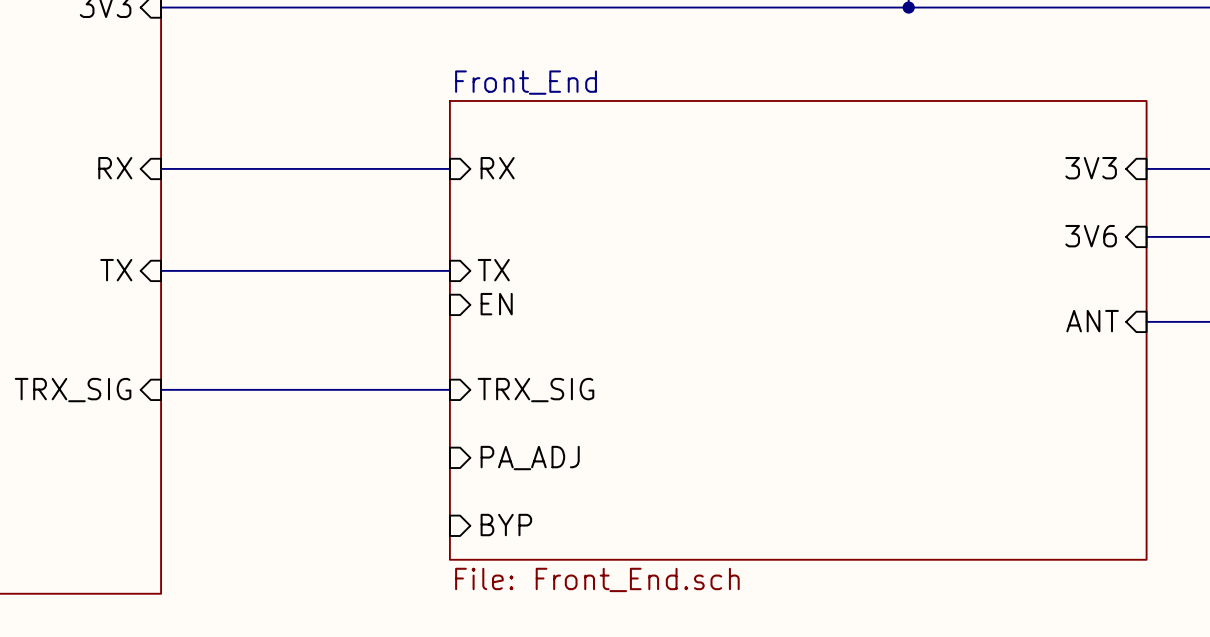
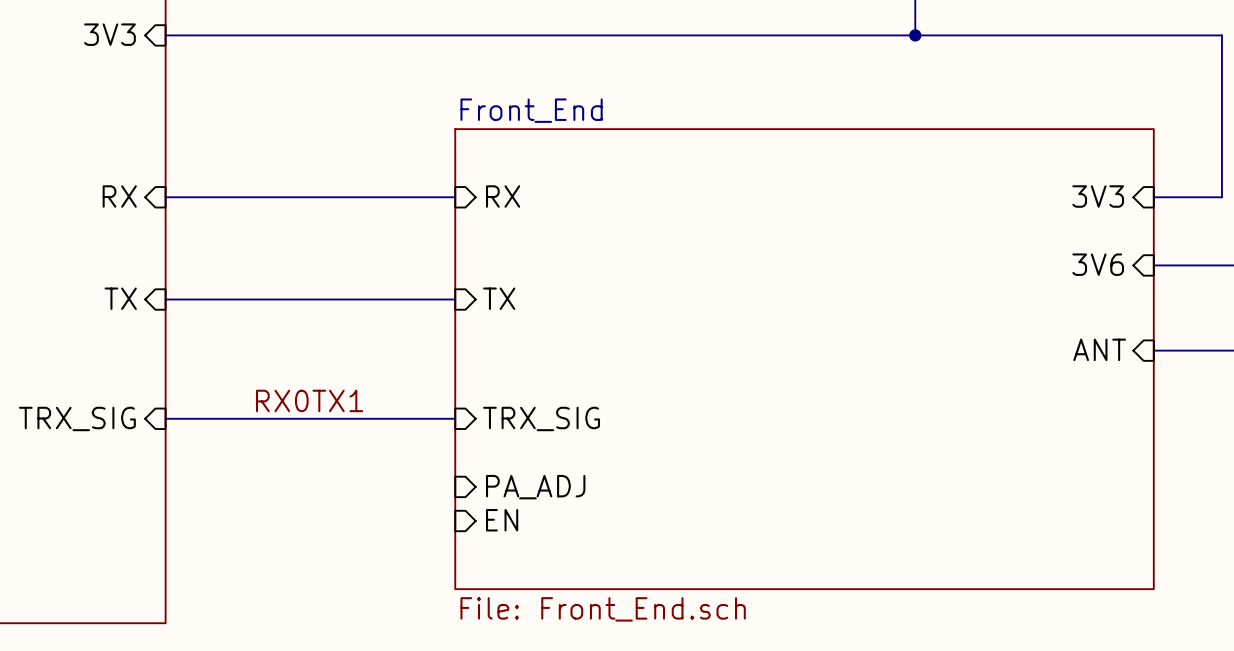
sheet pin position: EN (496, 304) -> EN (502, 520)
label: none -> RX0TX1 (309, 400)
sheet pin: BYP (506, 525) -> none

